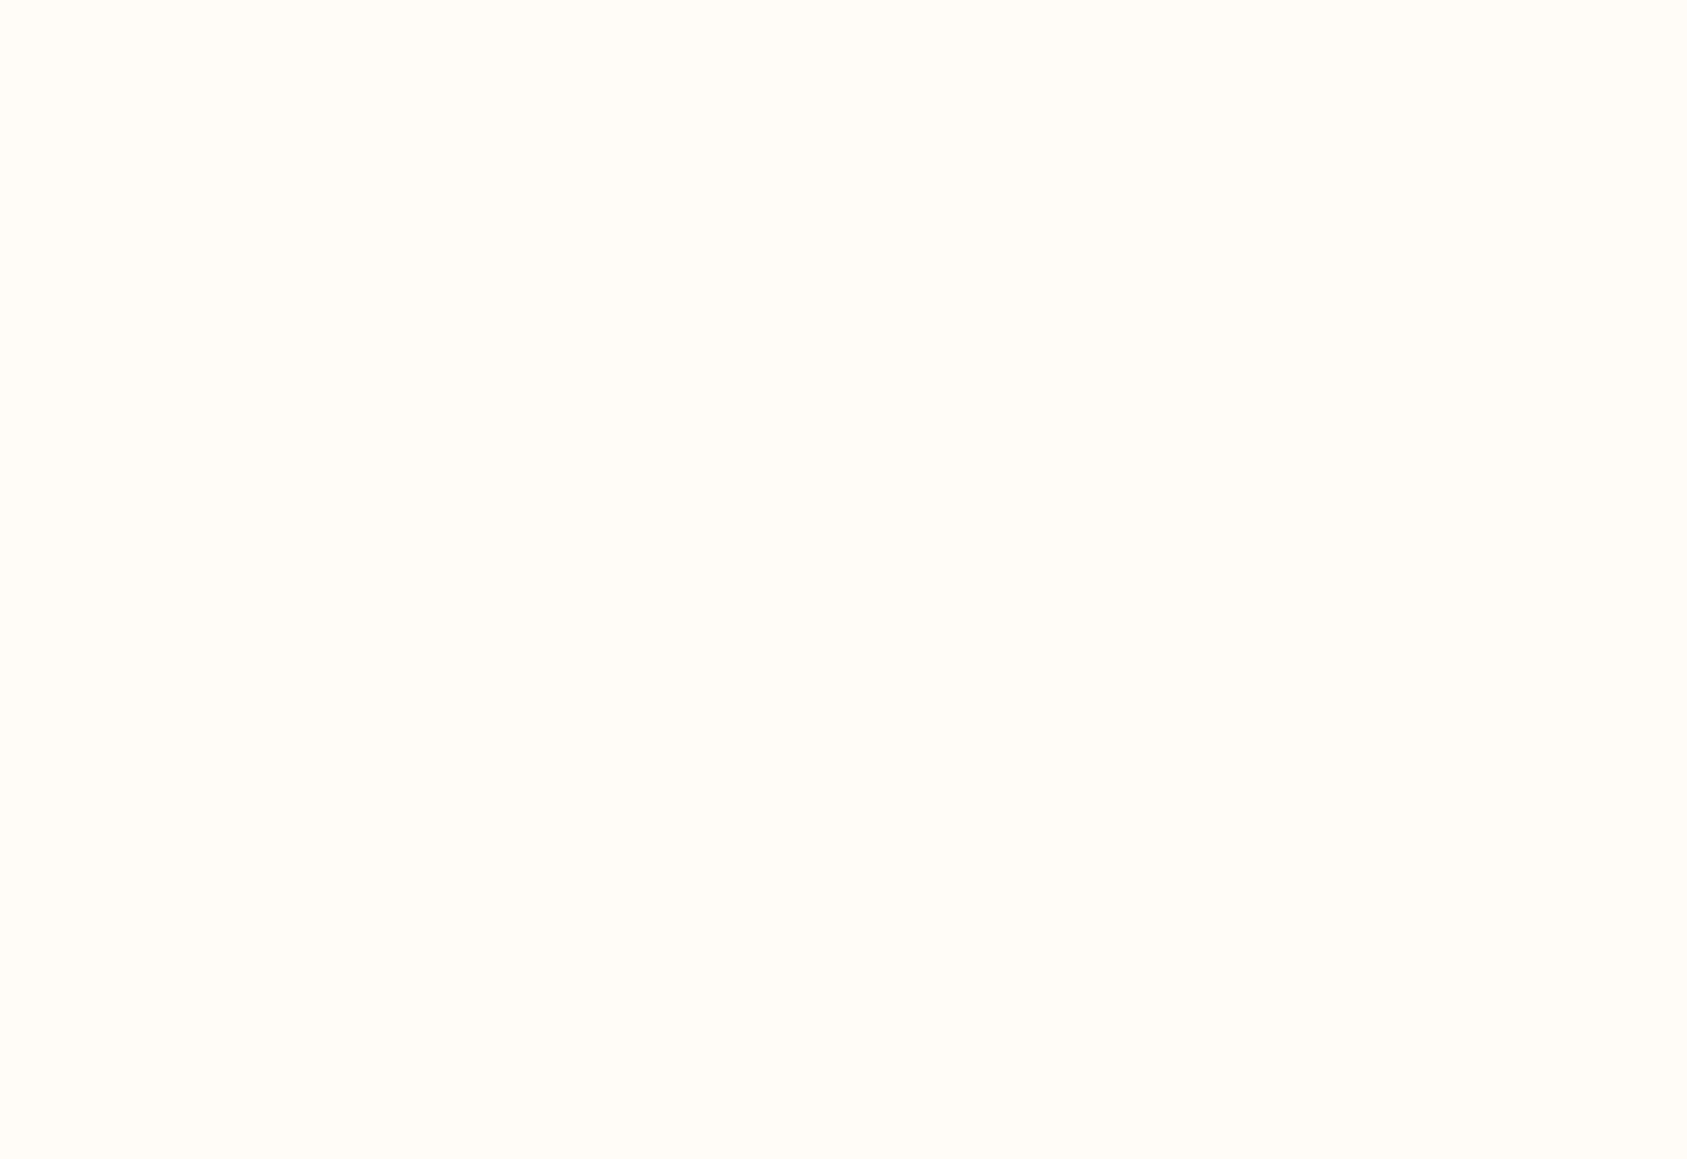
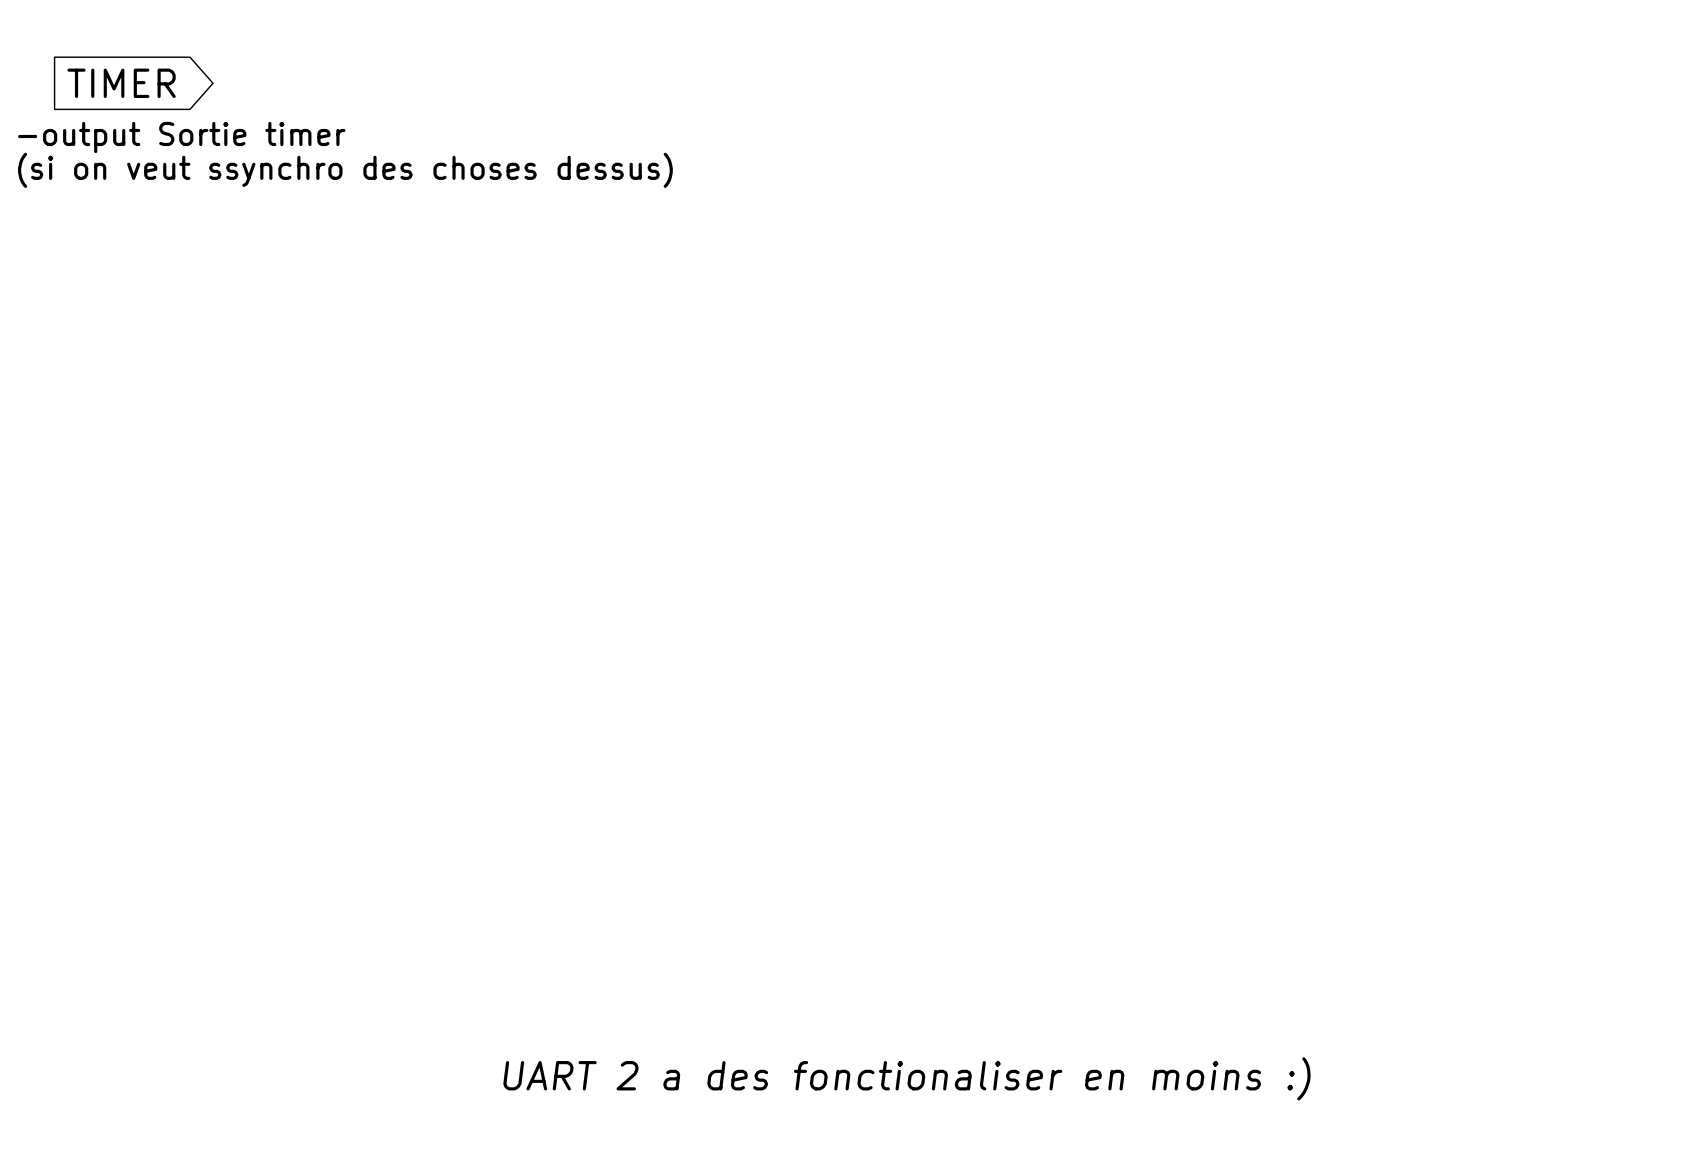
global label: none -> TIMER (121, 83)
text: none -> -output Sortie timer (181, 137)
text: none -> (si on veut ssynchro des choses dessus) (345, 170)
text: none -> UART 2 a des fonctionaliser en moins :) (907, 1078)

